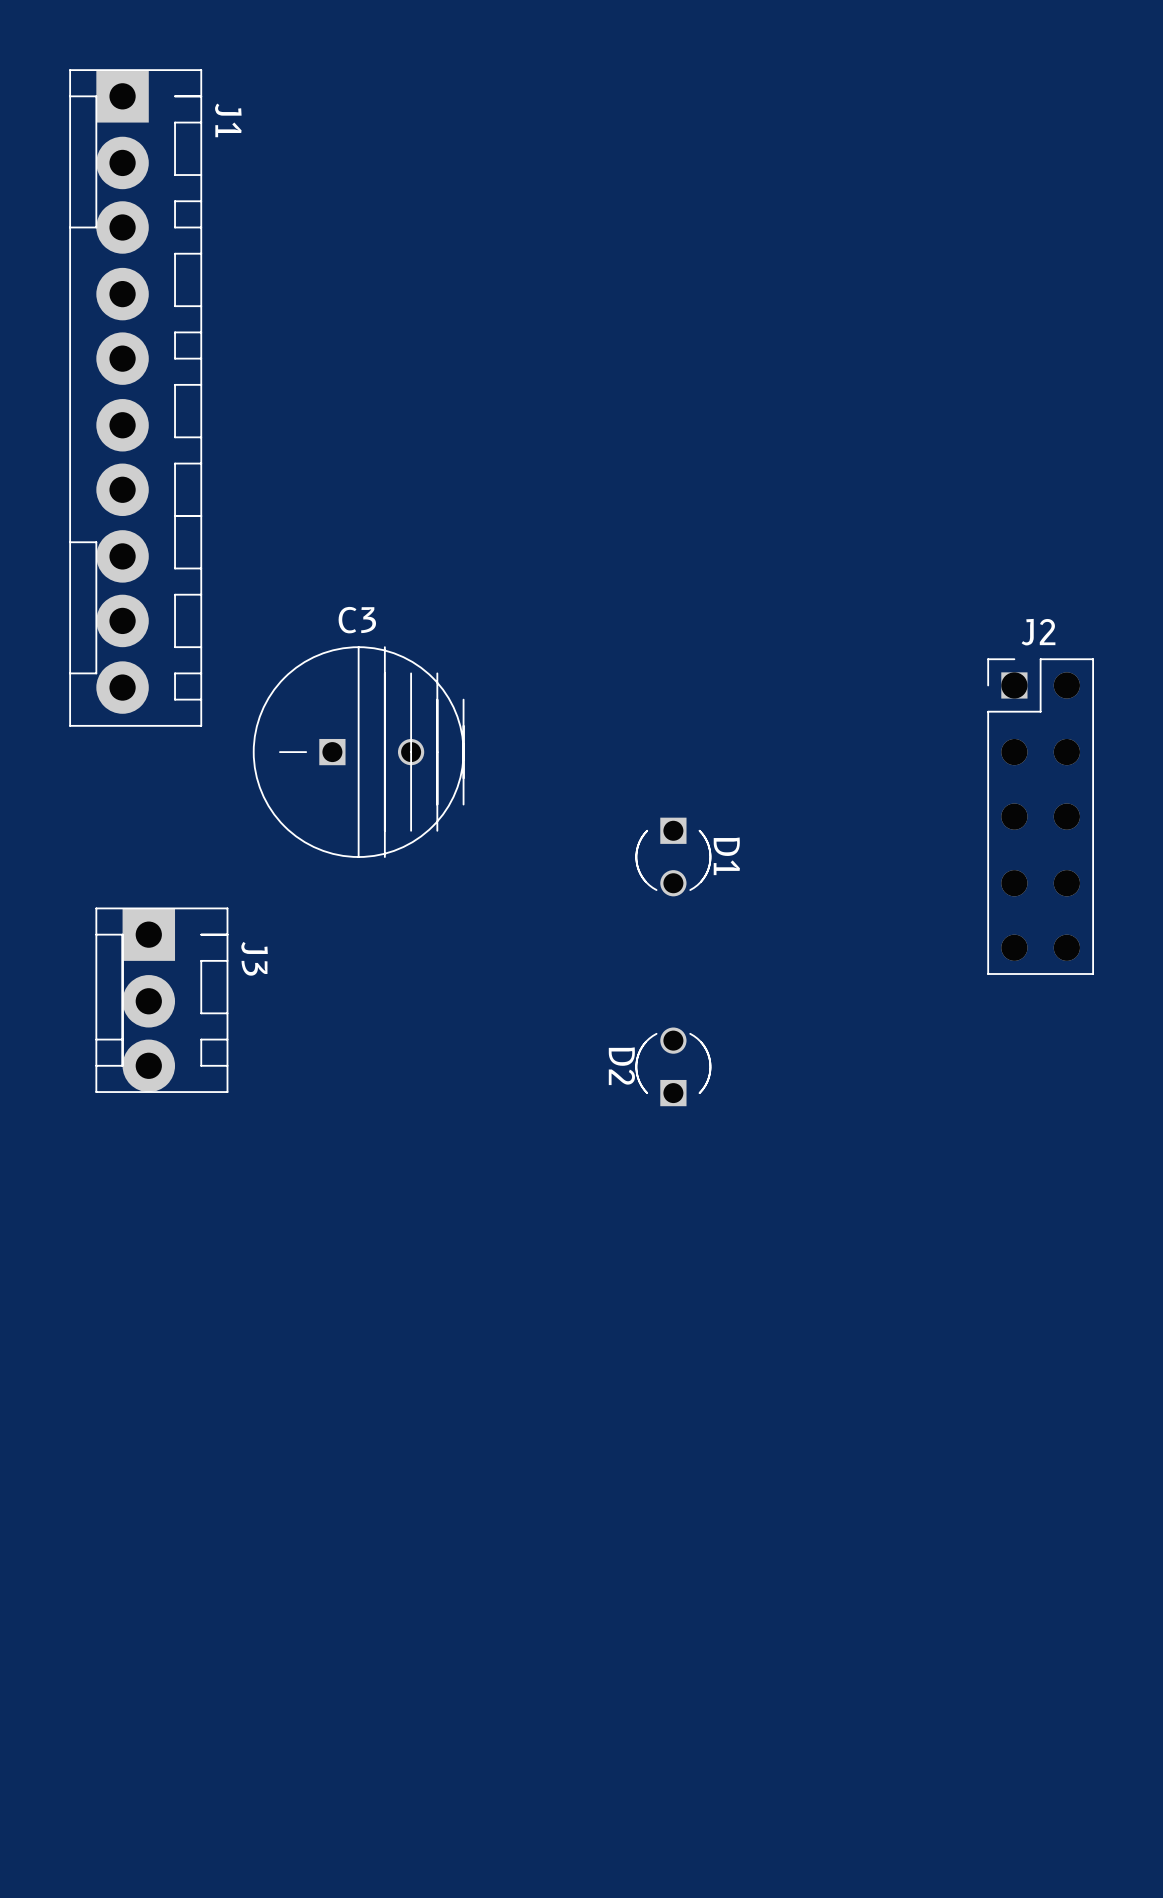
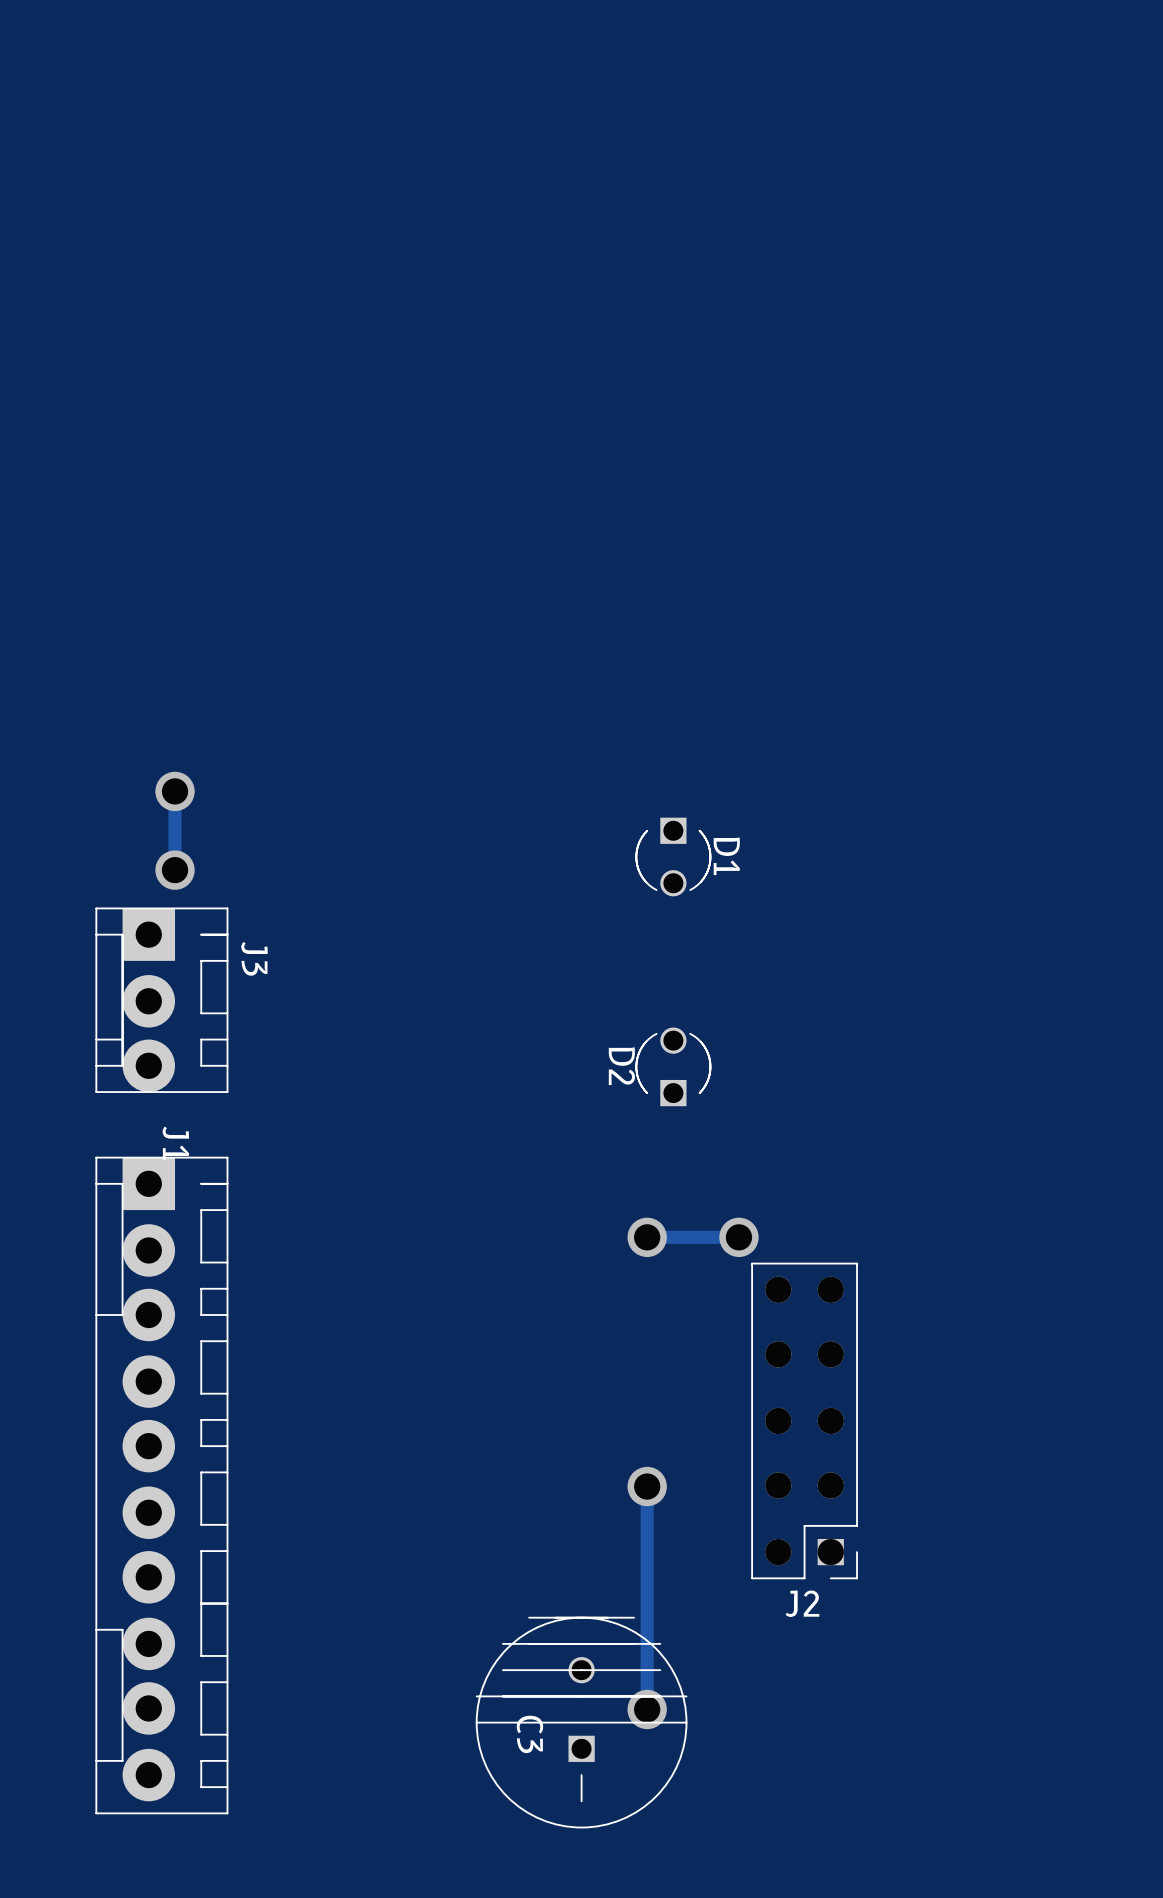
J1 name position: J1 (228, 120) -> J1 (175, 1143)
J1 position: (135, 397) -> (161, 1485)
C3 name position: C3 (357, 620) -> C3 (529, 1734)
C3 rotation: 0° (358, 752) -> 90° counterclockwise (581, 1722)
C3 position: (358, 752) -> (581, 1722)
track: none -> (175, 791) (175, 870)
via: none -> (175, 791)
J2 rotation: 0° (1040, 816) -> 180° (804, 1420)
J2 position: (1040, 816) -> (804, 1420)
via: none -> (175, 870)
via: none -> (647, 1237)
track: none -> (738, 1237) (647, 1237)
via: none -> (738, 1237)
track: none -> (647, 1486) (647, 1709)
via: none -> (647, 1486)
via: none -> (647, 1709)

